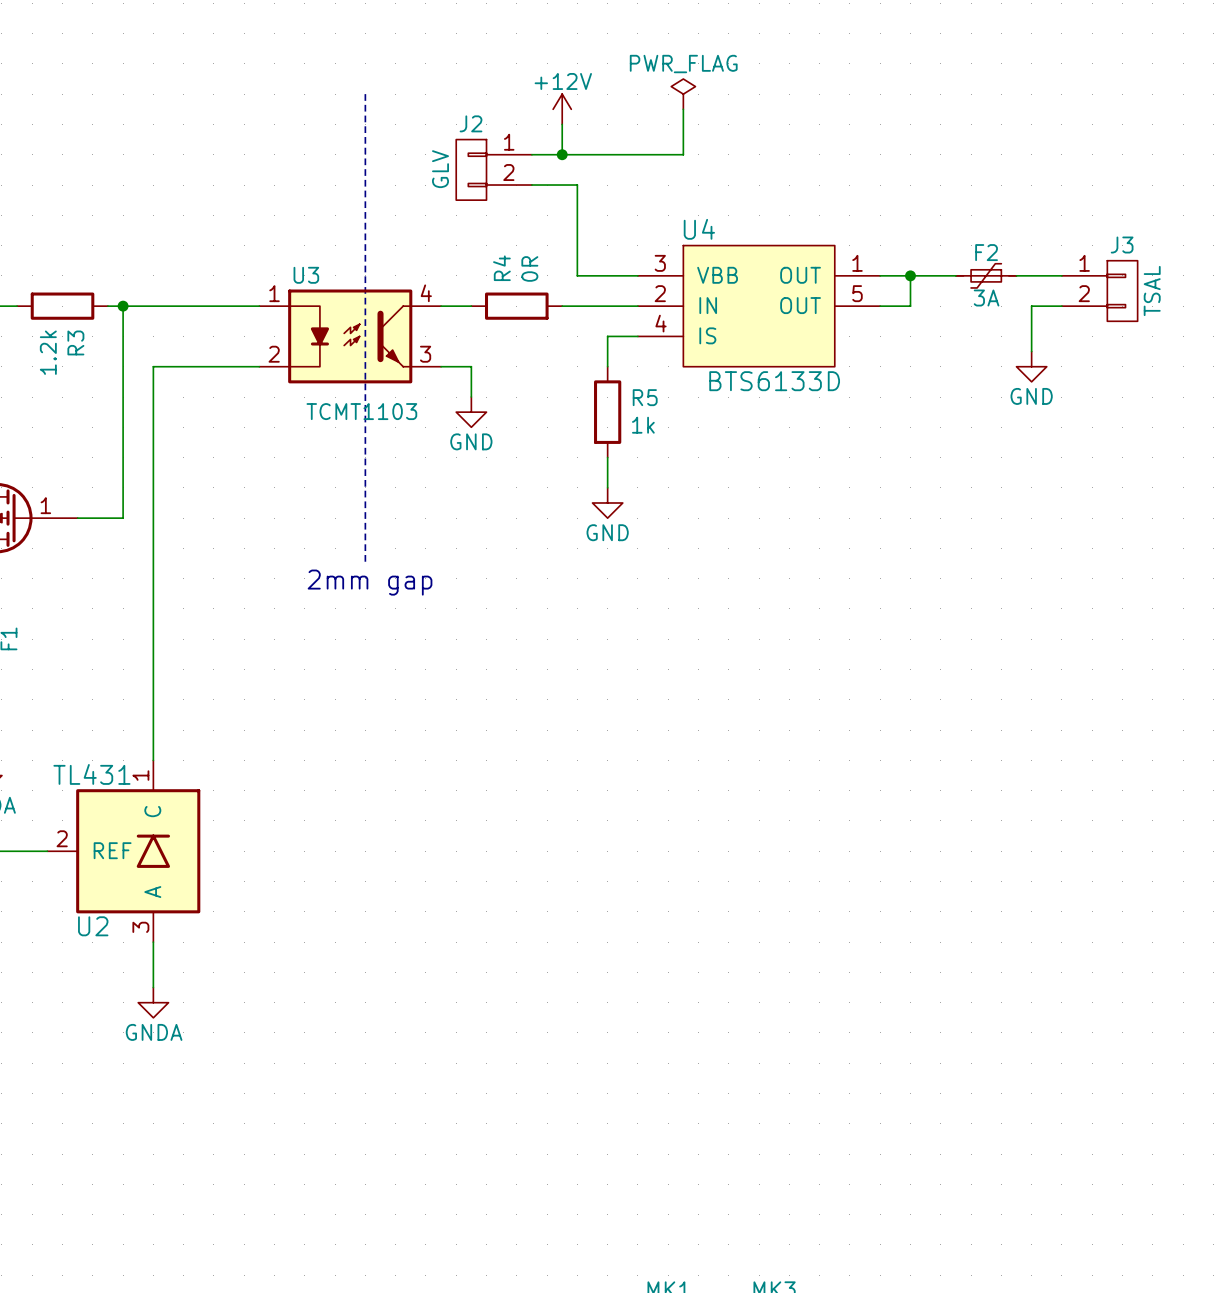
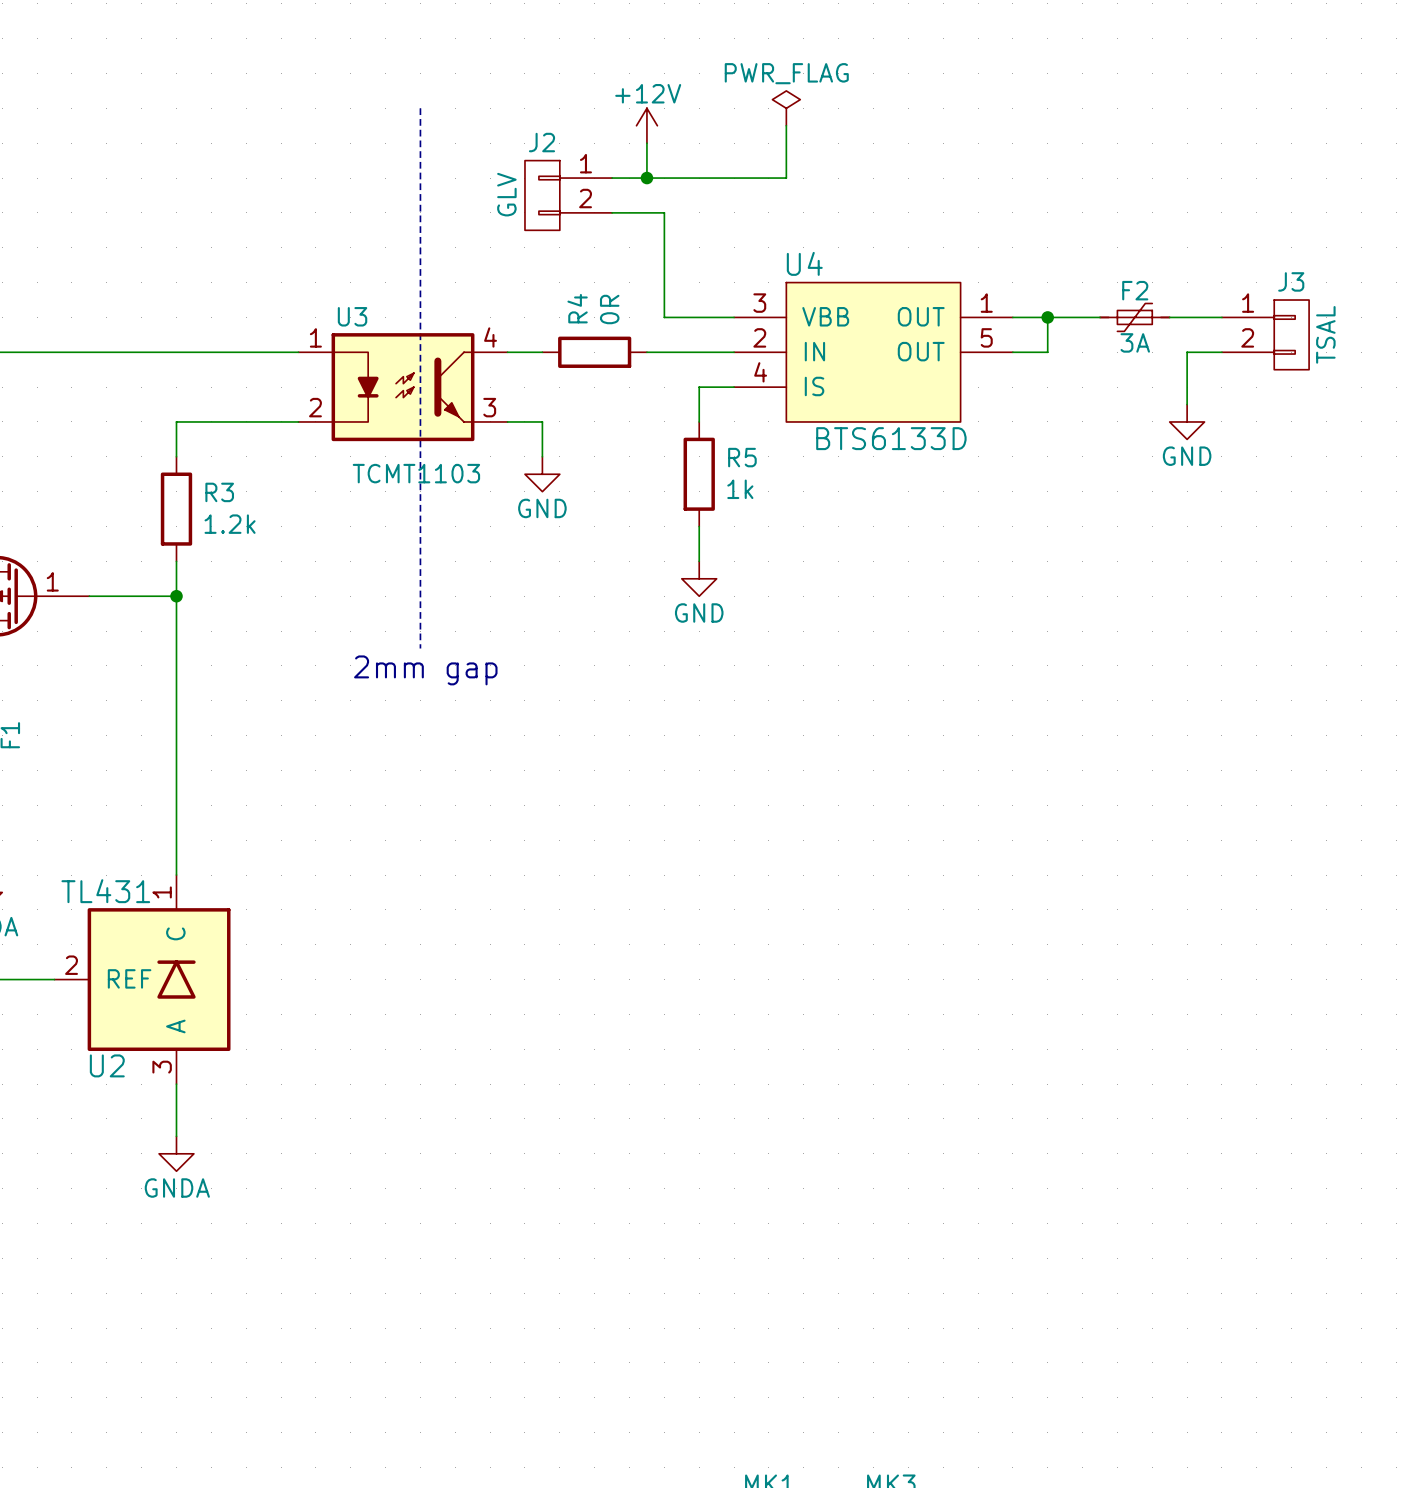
wire: none -> (19, 352) (124, 352)
R3 rotation: 0° (62, 306) -> 90° clockwise (176, 509)
R3 position: (62, 306) -> (176, 509)
wire: (123, 306) (123, 518) -> (176, 596) (141, 596)
junction: (123, 306) -> none
R3 name position: R3 (75, 342) -> R3 (219, 492)
R3 value position: 1.2k (48, 352) -> 1.2k (230, 524)
wire: (153, 397) (153, 487) -> none
junction: none -> (176, 596)

